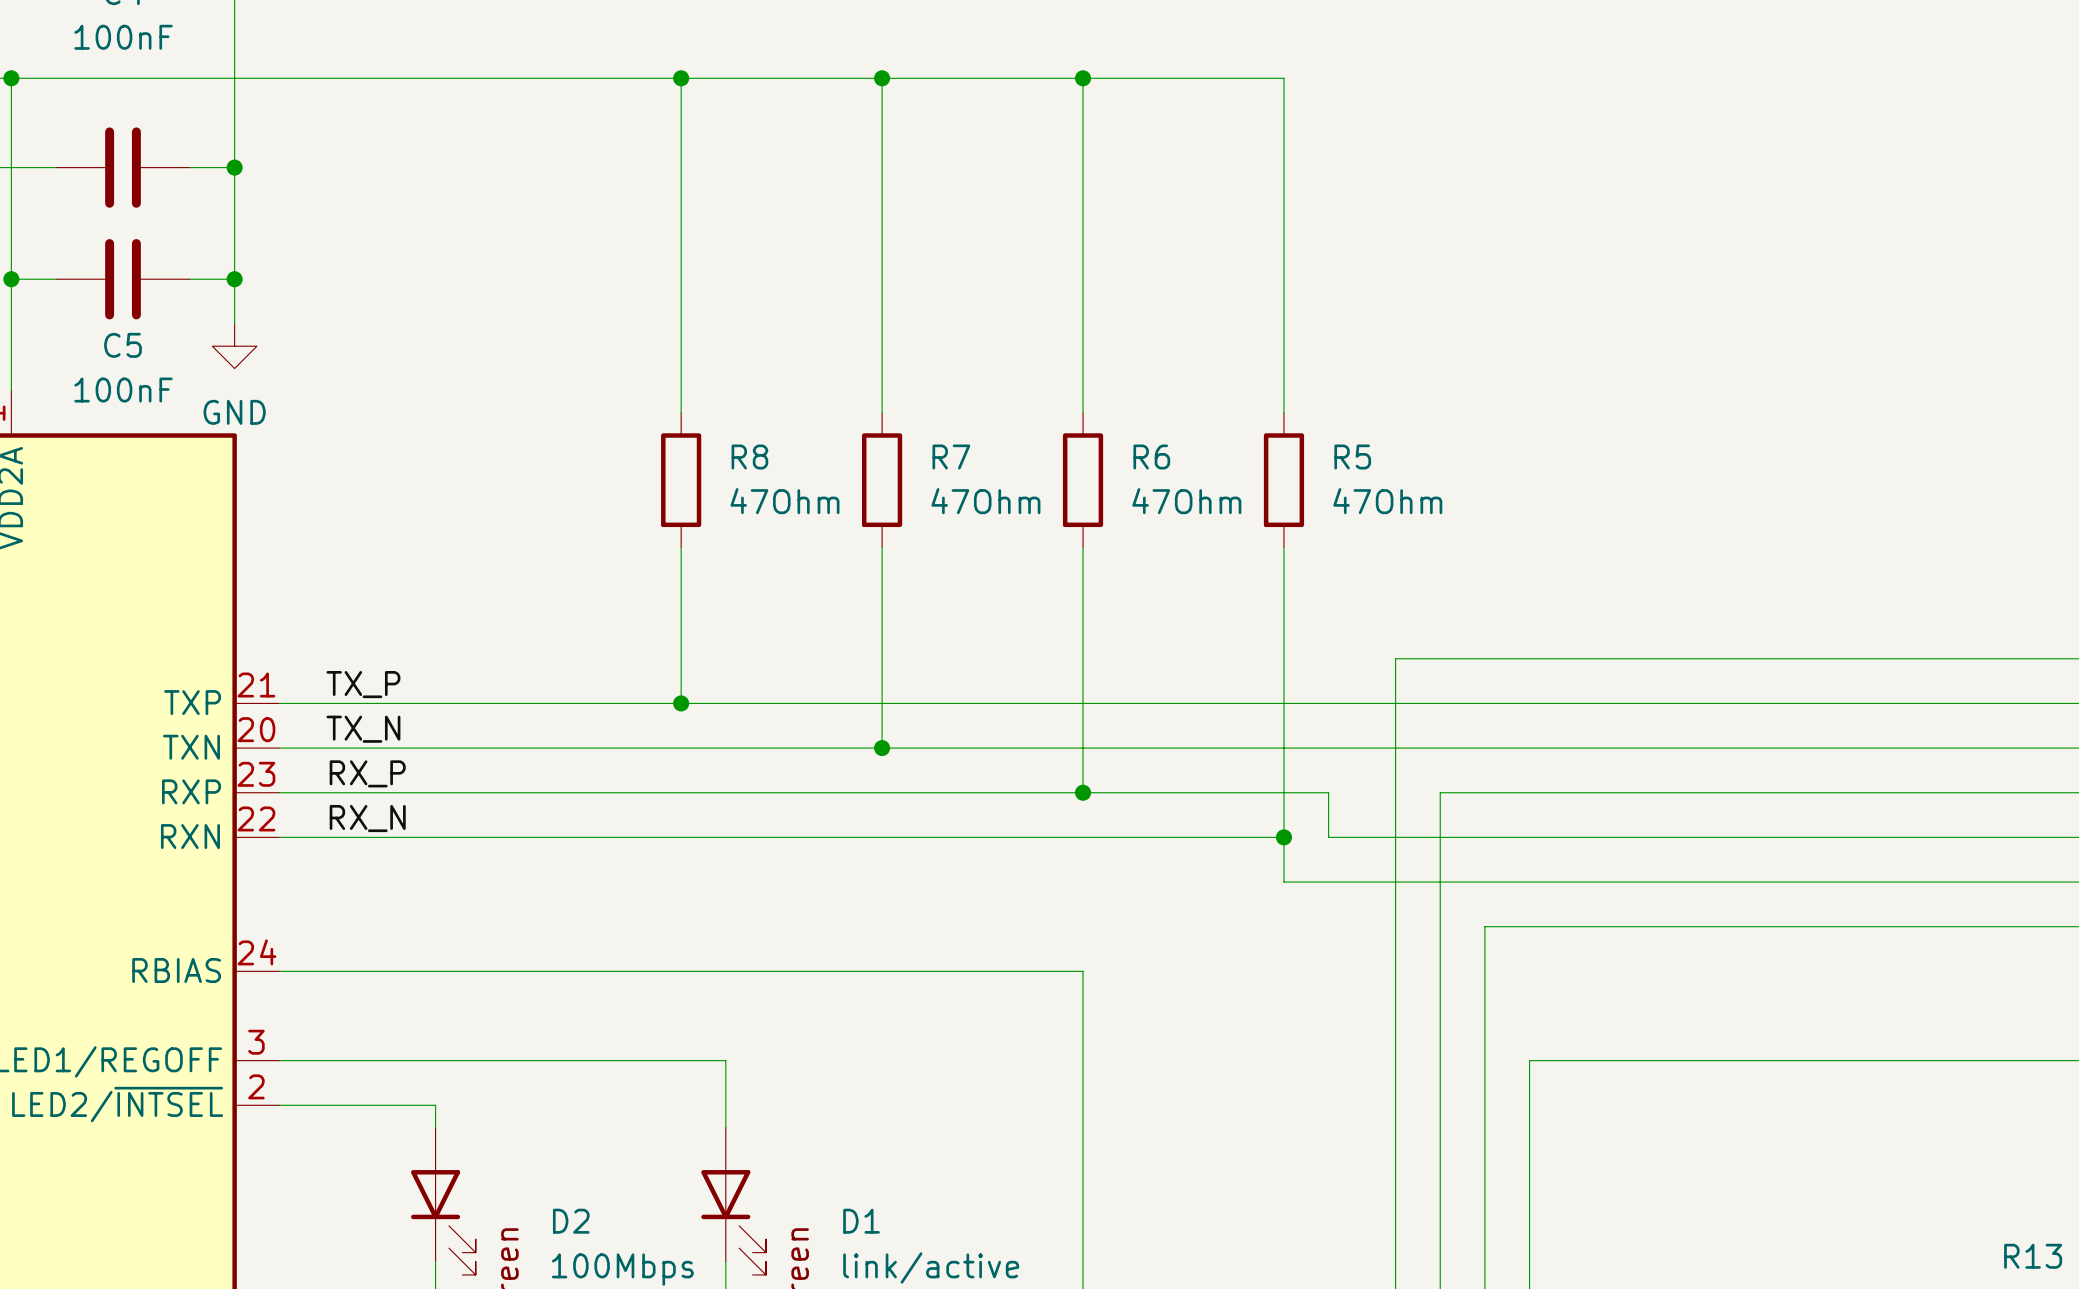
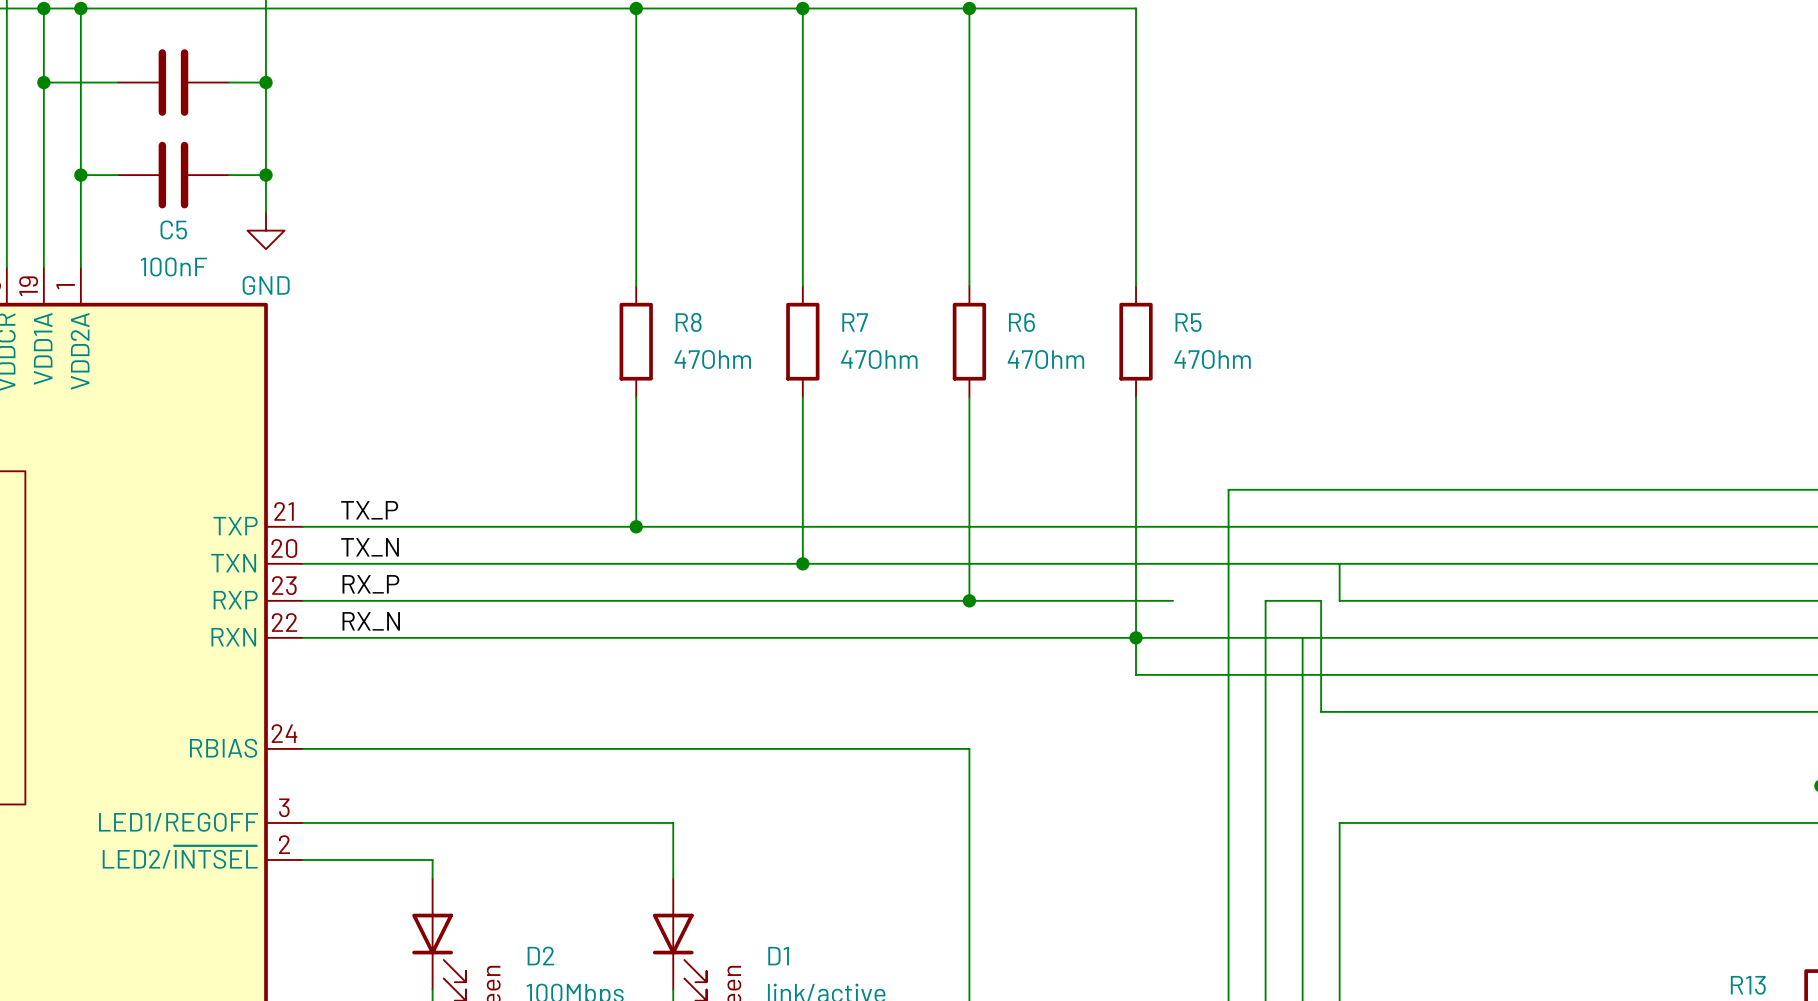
wire: (1328, 792) (1328, 837) -> (1136, 637) (1173, 637)
wire: (1507, 792) (1529, 792) -> (1339, 563) (1339, 600)
wire: none -> (1321, 600) (1321, 711)
wire: (1484, 926) (1507, 926) -> (1302, 711) (1302, 637)

